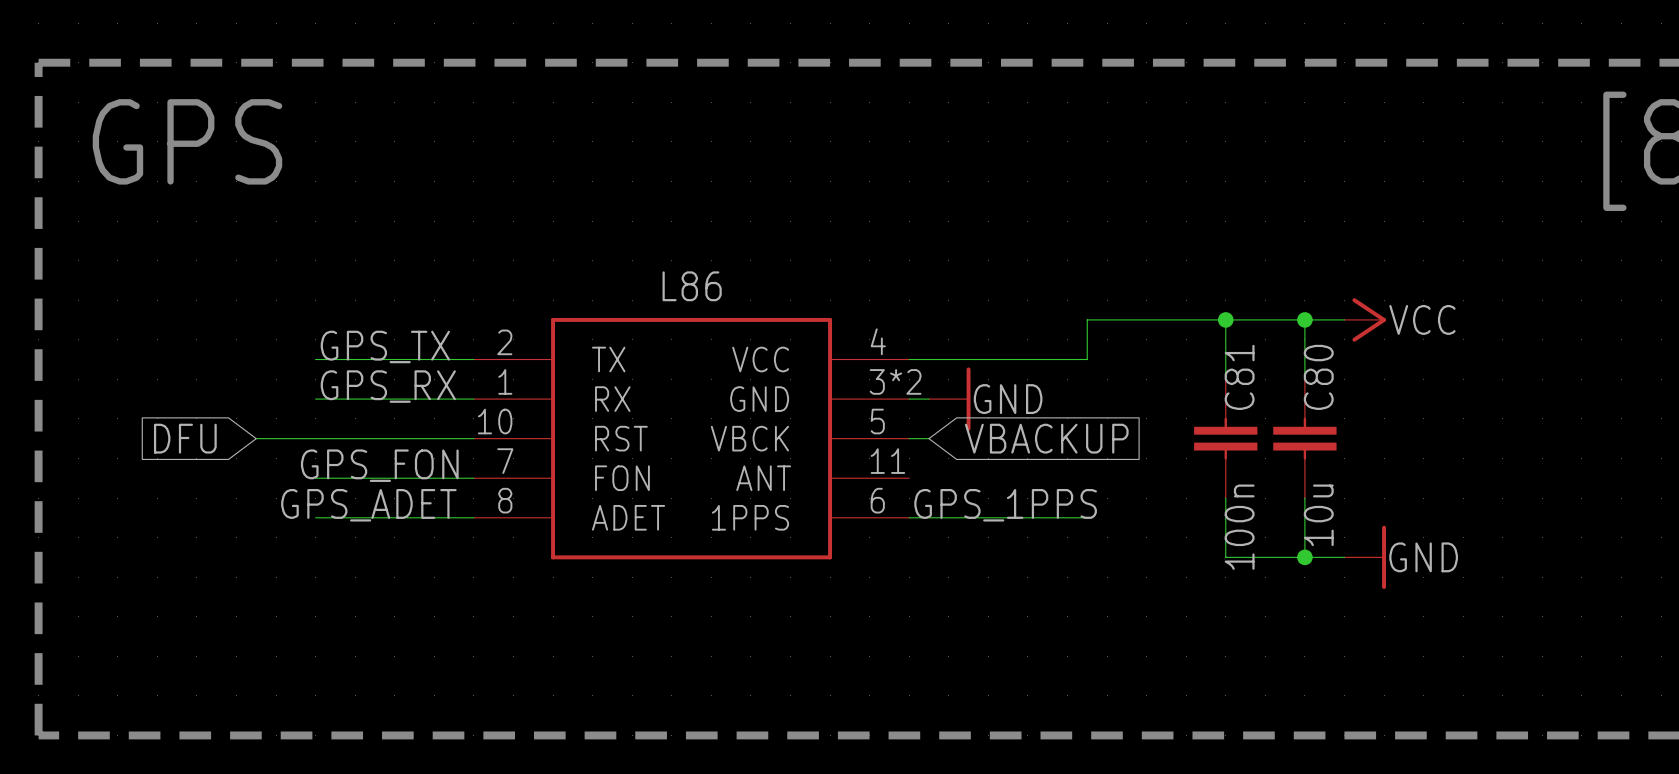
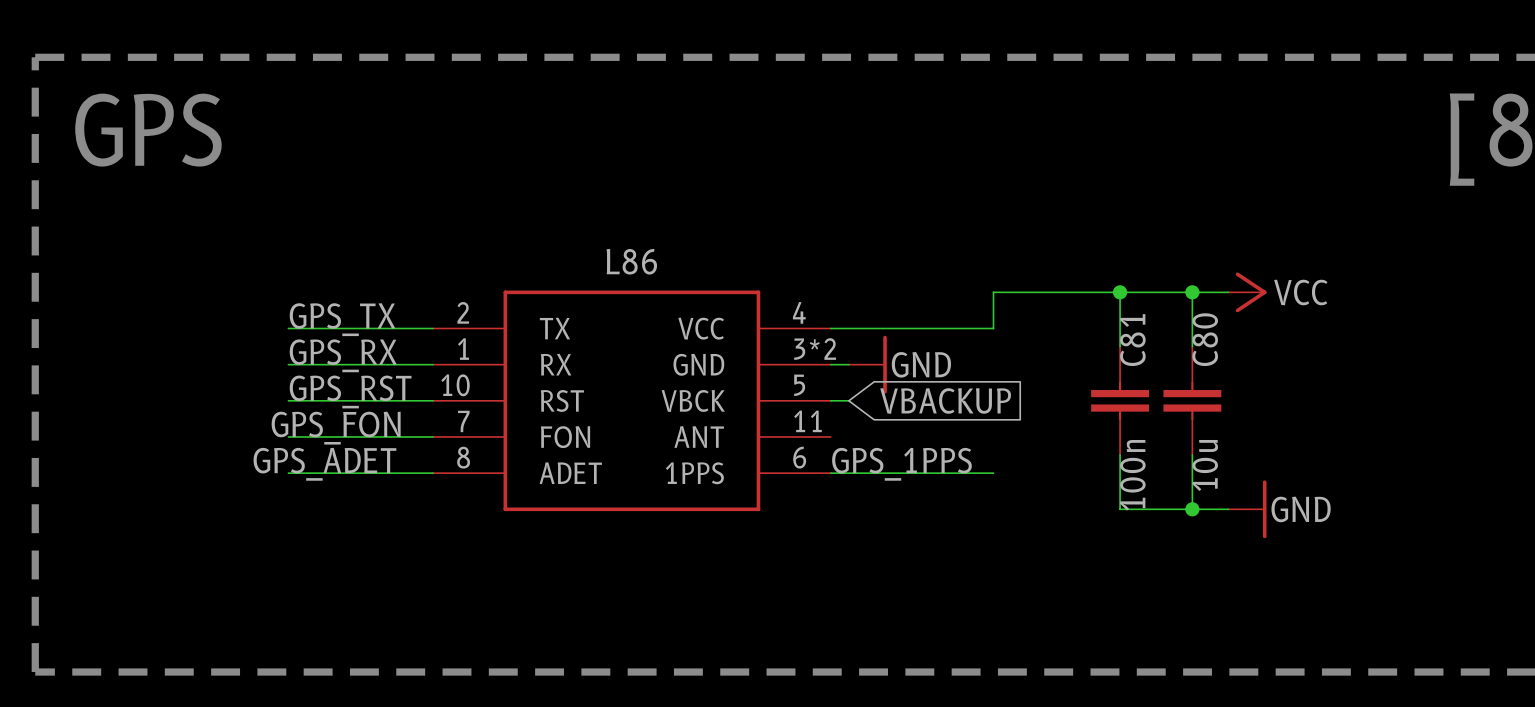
label: none -> GPS_RST (350, 391)
global label: DFU (185, 438) -> none
wire: (256, 438) (315, 438) -> none

